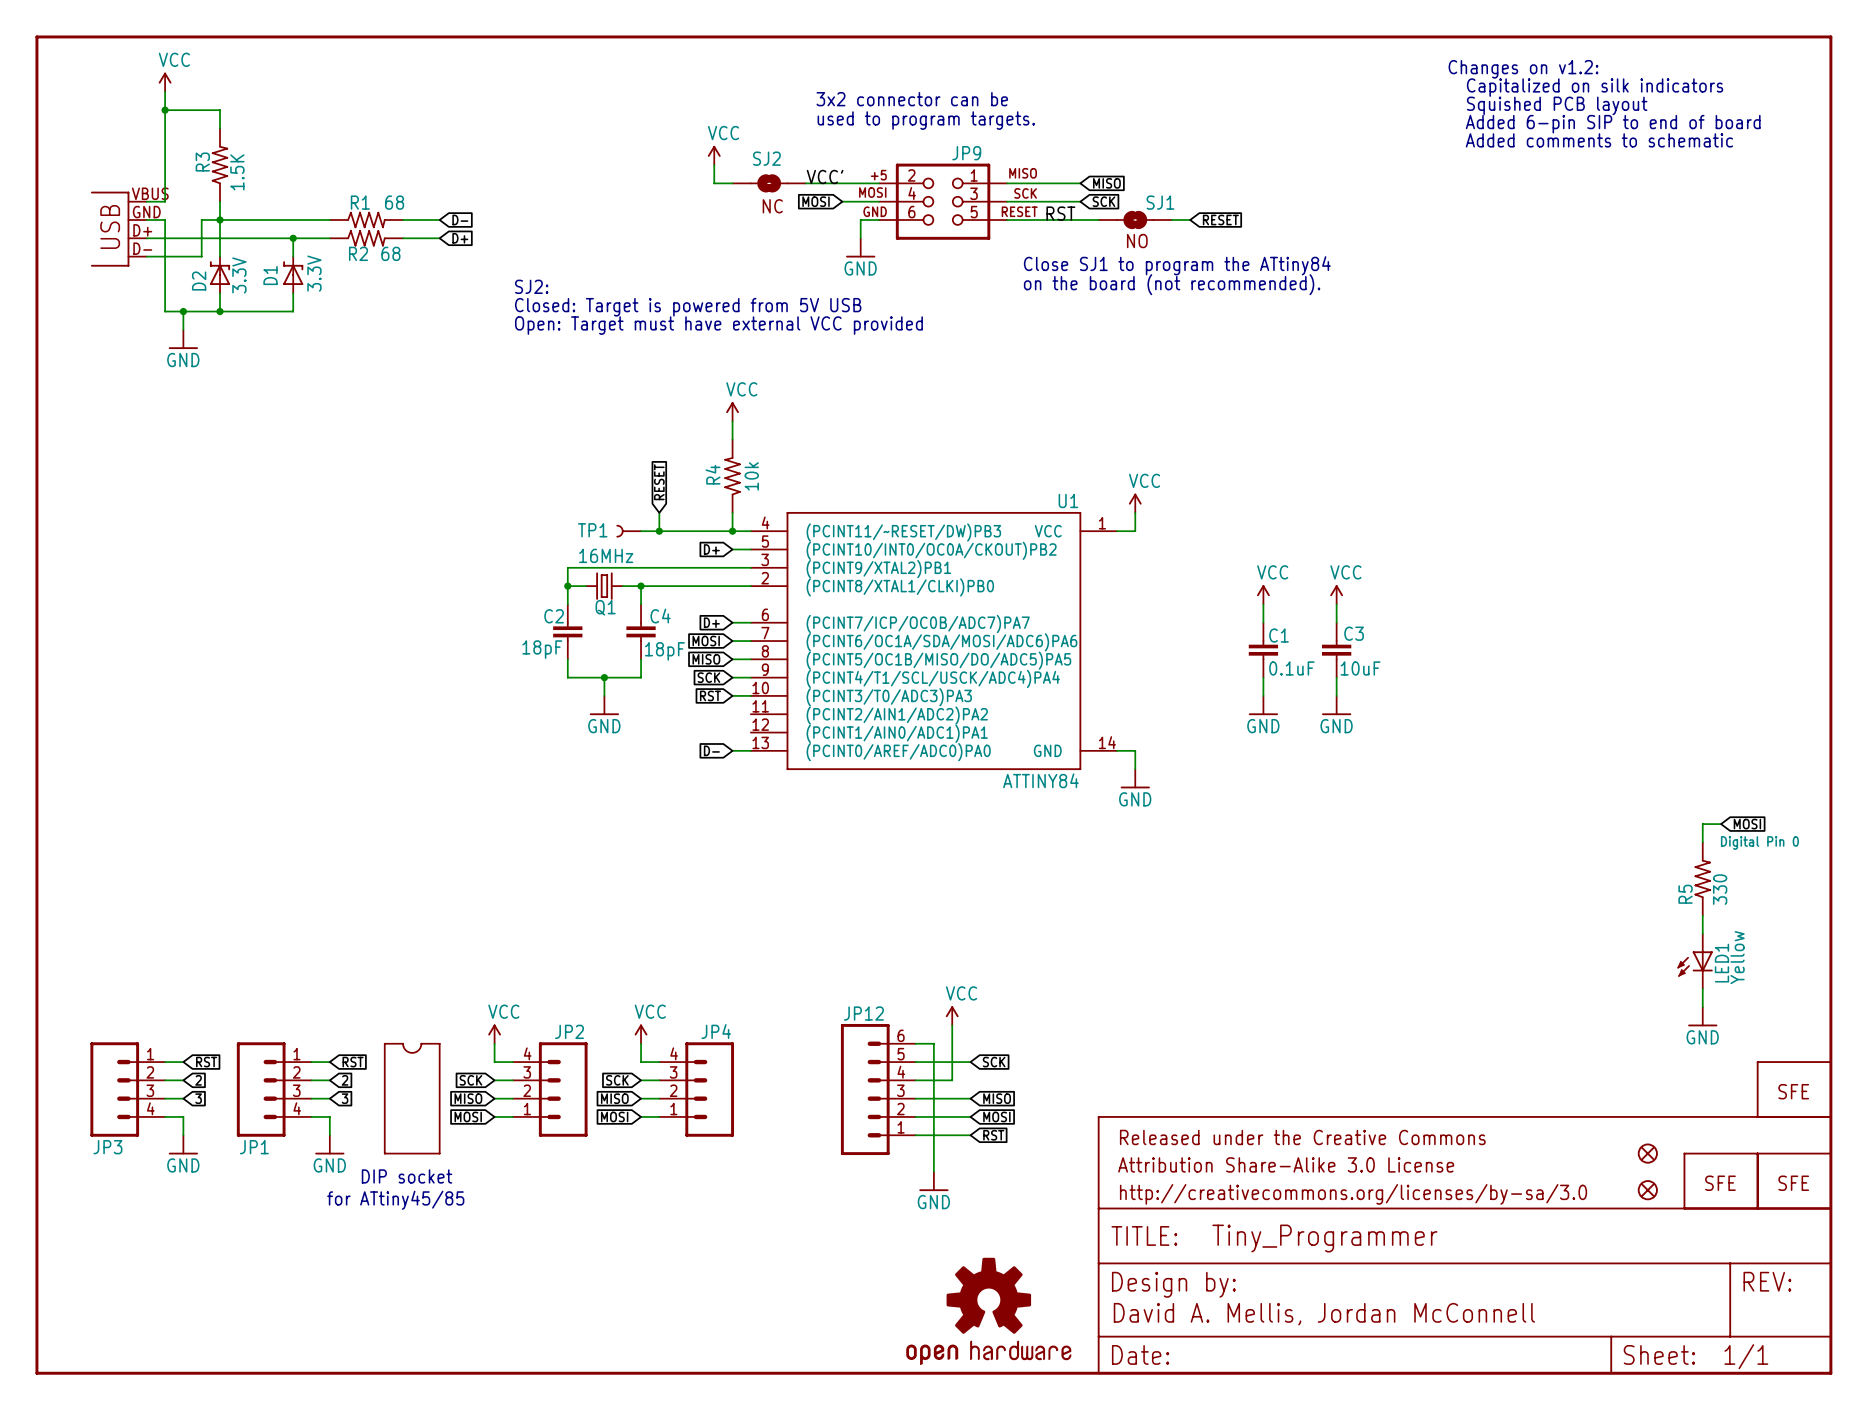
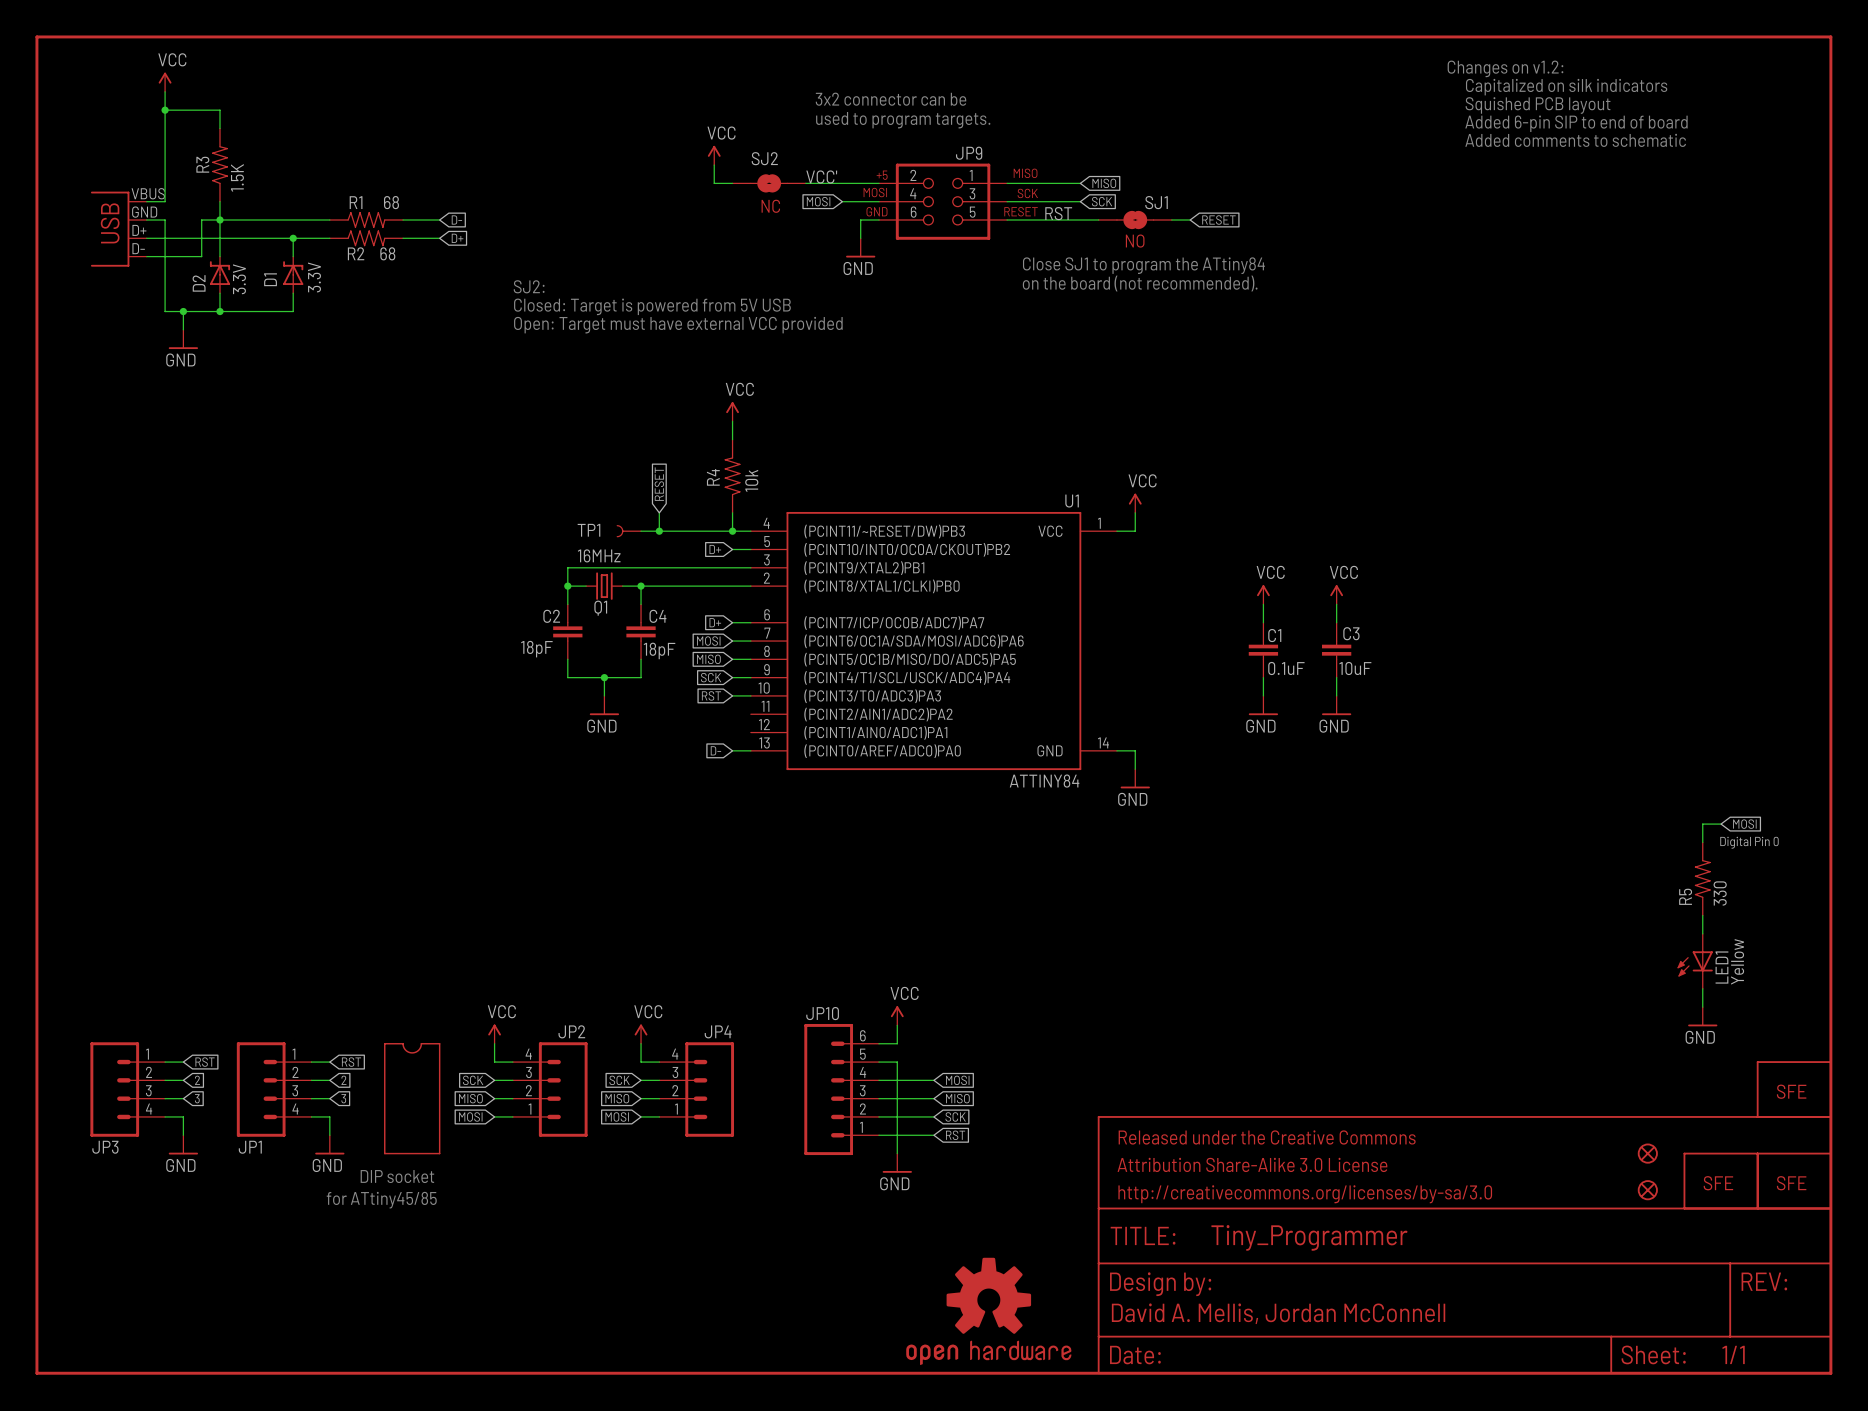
power symbol position: VCC (952, 1015) -> VCC (897, 1015)
wire: (952, 1025) (952, 1080) (933, 1080) -> none
wire: (915, 1043) (933, 1043) (933, 1171) -> none
wire: none -> (879, 1062) (897, 1062) (897, 1153)
wire: (915, 1062) (970, 1062) -> none
global label position: SCK (994, 1062) -> SCK (955, 1116)
JP10: none -> (841, 1089)
JP12: (878, 1089) -> none
global label position: MISO (997, 1098) -> MISO (957, 1098)
global label position: MOSI (996, 1116) -> MOSI (957, 1080)
global label position: RST (993, 1135) -> RST (955, 1135)
power symbol position: GND (933, 1181) -> GND (897, 1163)

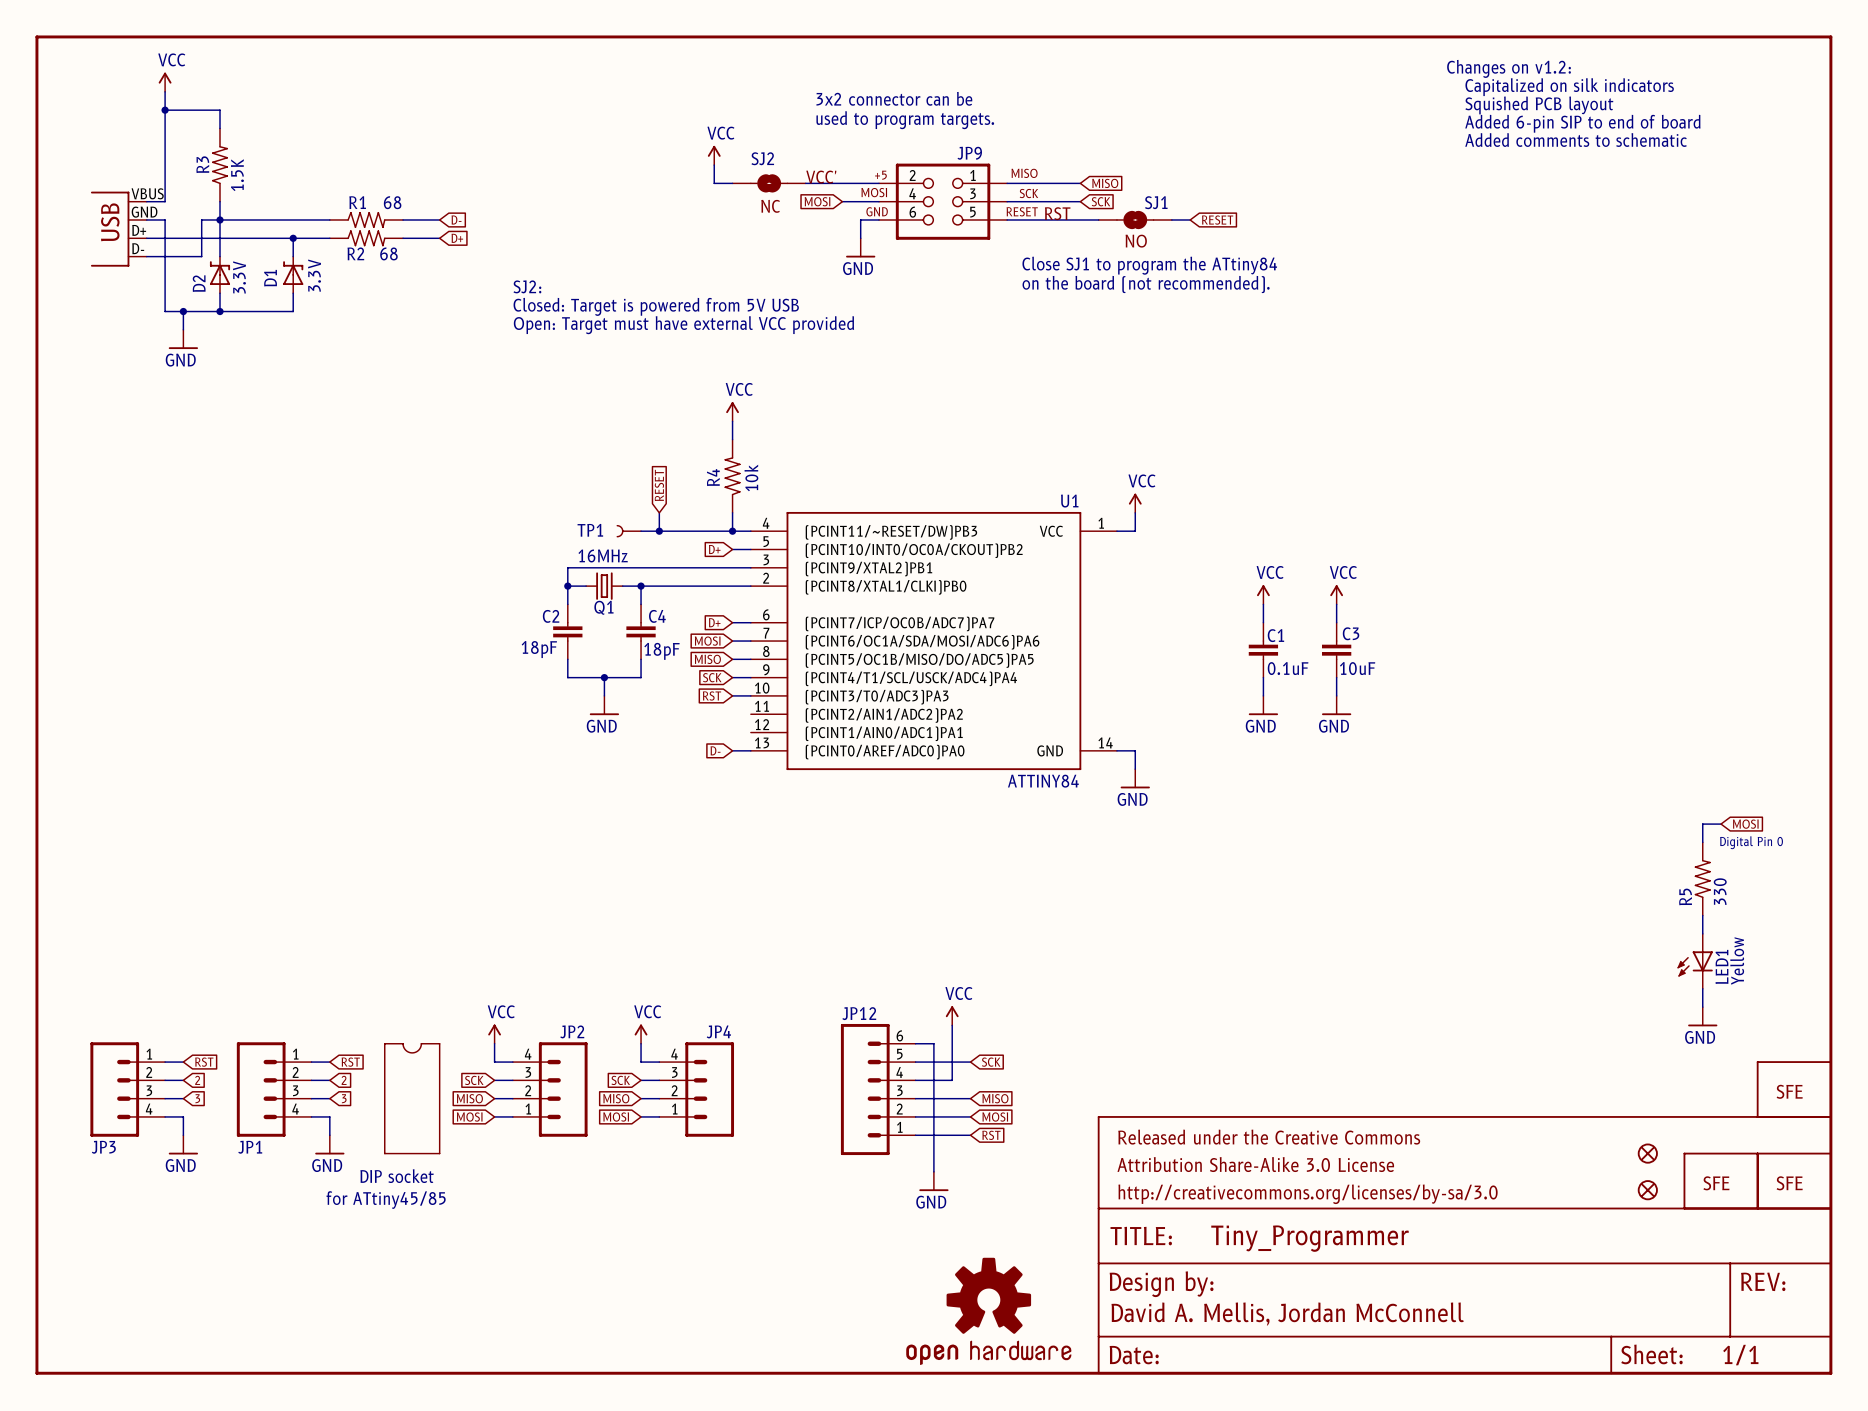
power symbol position: VCC (897, 1015) -> VCC (952, 1015)
wire: none -> (952, 1025) (952, 1080) (933, 1080)
wire: none -> (915, 1043) (933, 1043) (933, 1171)
wire: (879, 1062) (897, 1062) (897, 1153) -> none
wire: none -> (915, 1062) (970, 1062)
global label position: MOSI (957, 1080) -> MOSI (995, 1117)
JP10: (841, 1089) -> none
JP12: none -> (878, 1089)
global label position: MISO (957, 1098) -> MISO (995, 1098)
global label position: SCK (955, 1116) -> SCK (991, 1062)
global label position: RST (955, 1135) -> RST (991, 1135)
power symbol position: GND (897, 1163) -> GND (933, 1181)

